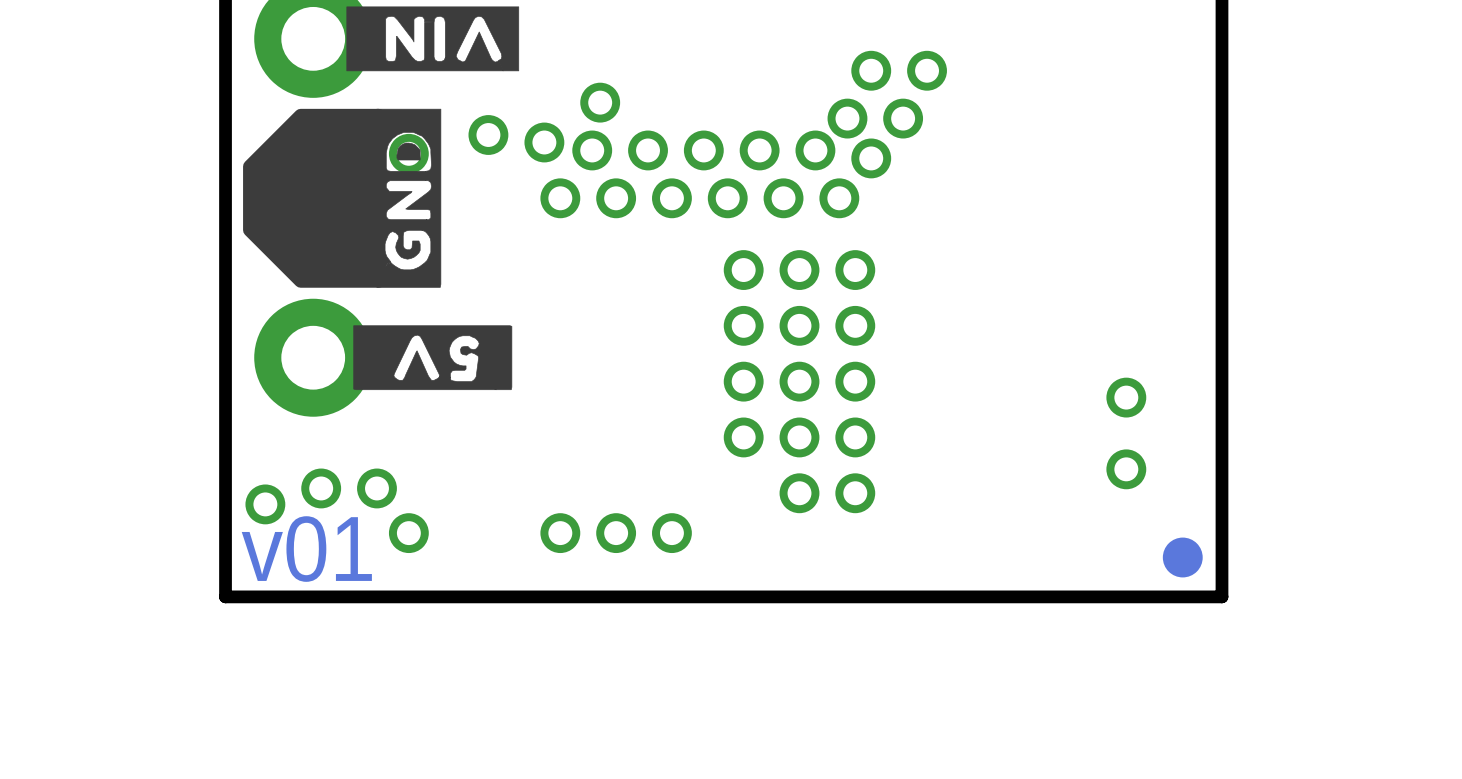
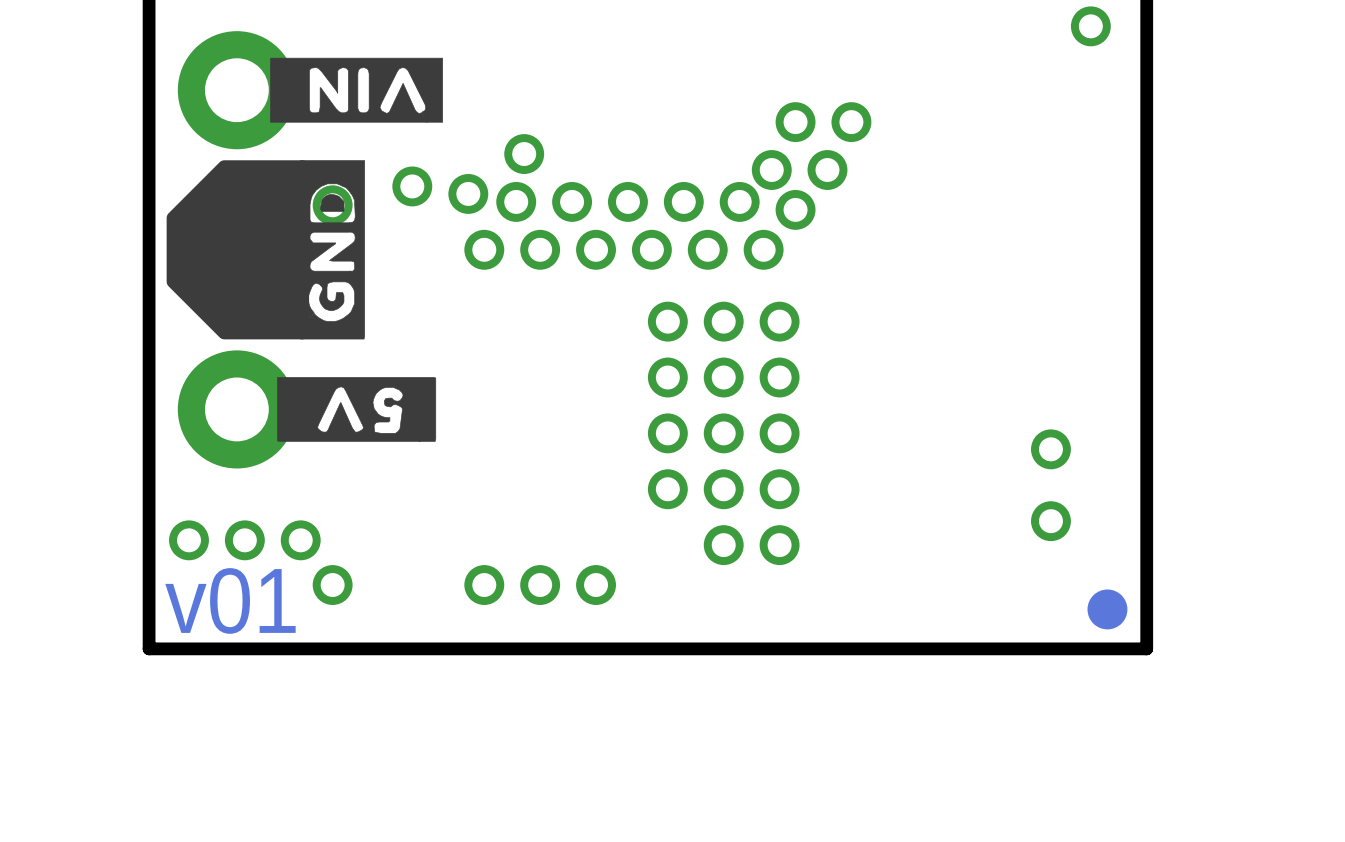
via position: (265, 504) -> (188, 540)

